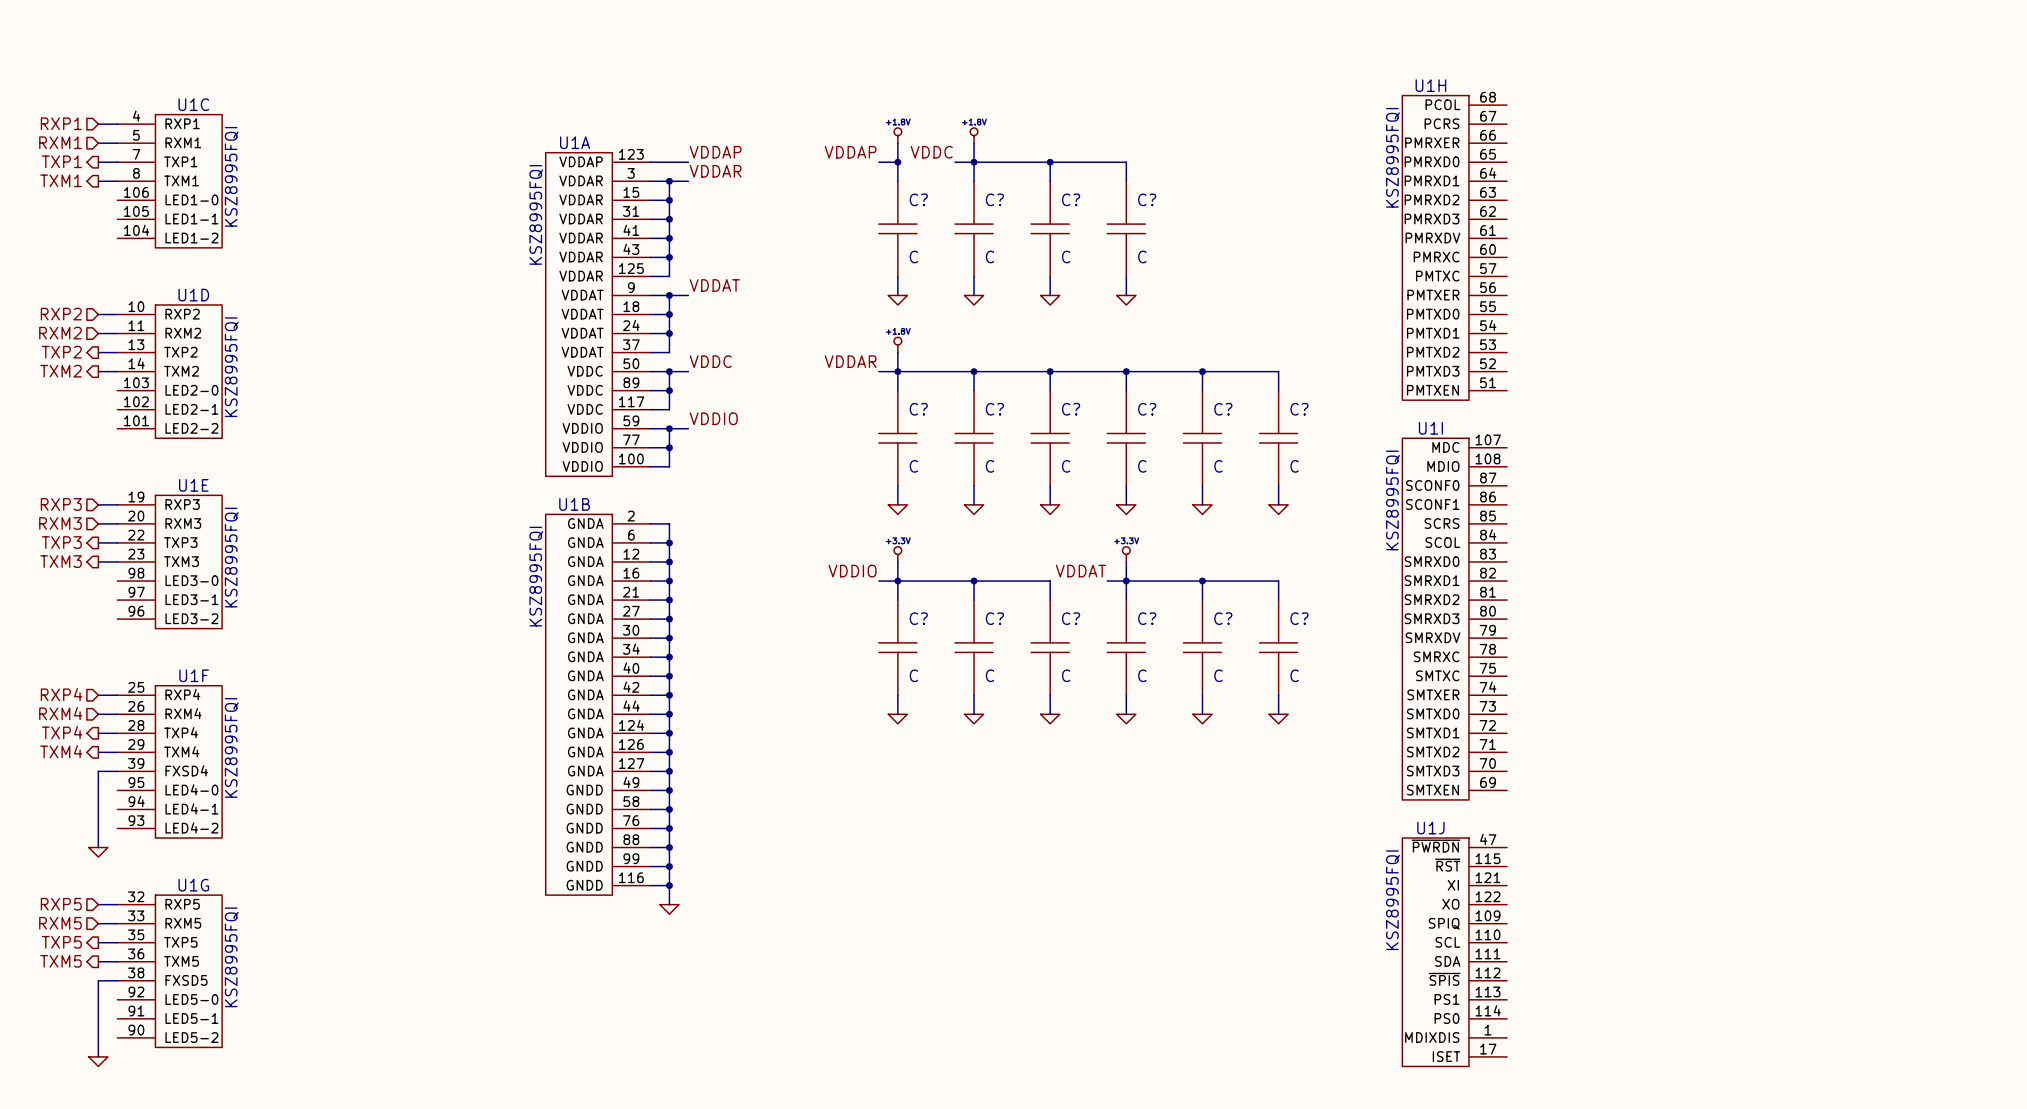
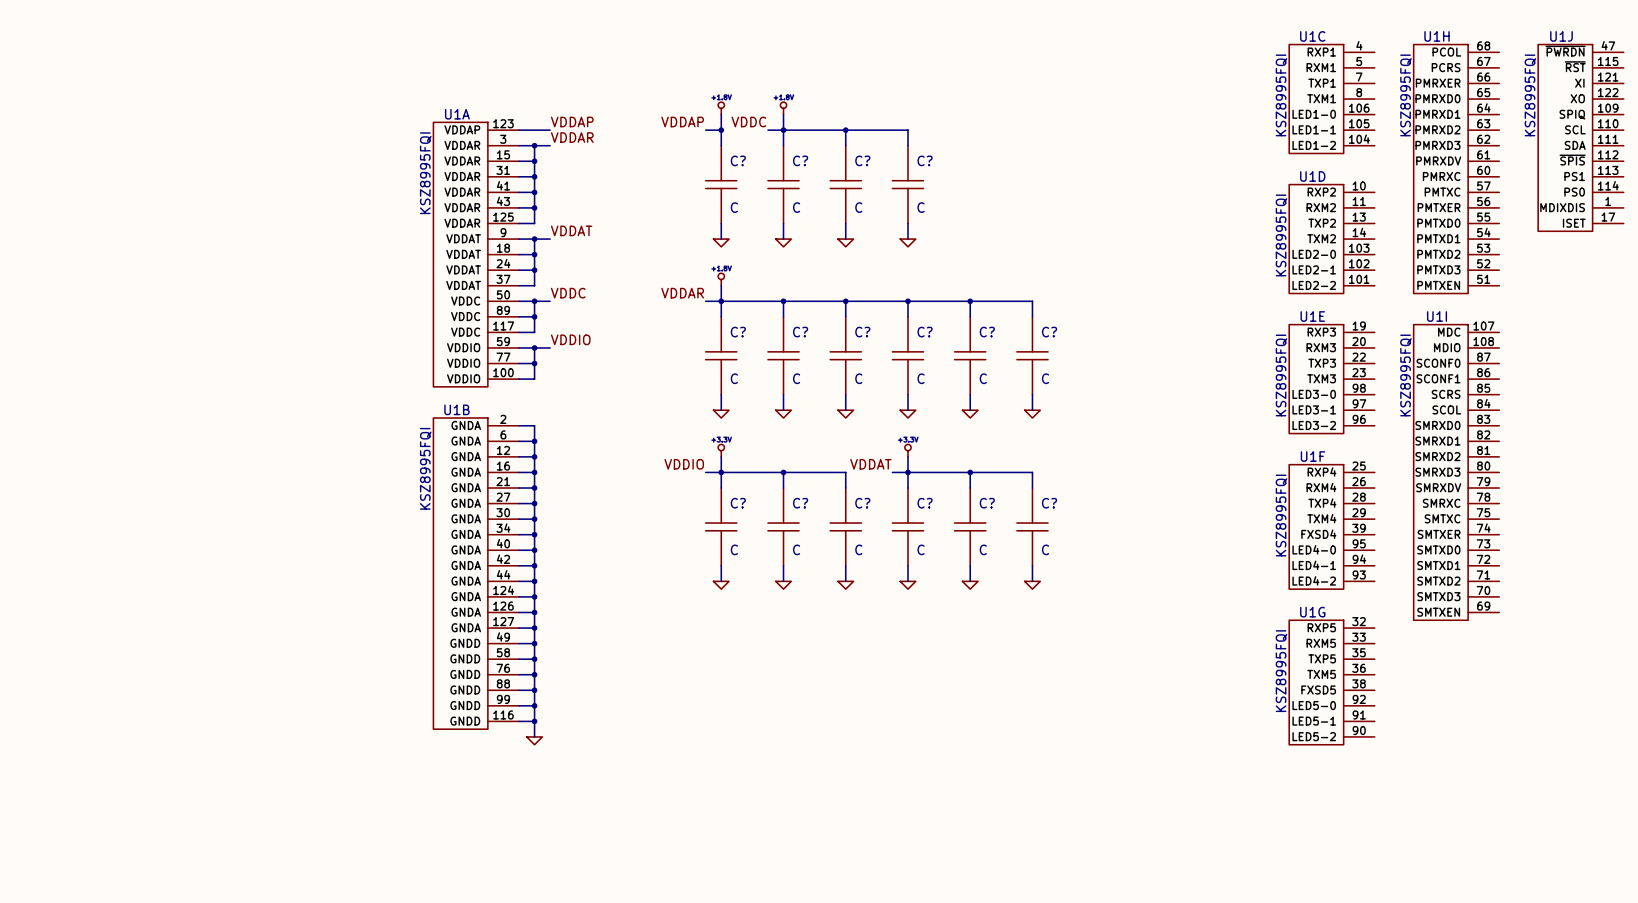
hierarchical label: RXP1 (61, 123) -> none
wire: (98, 124) (117, 124) -> none
hierarchical label: RXM1 (60, 142) -> none
wire: (98, 143) (117, 143) -> none
hierarchical label: TXP1 (61, 161) -> none
wire: (98, 162) (117, 162) -> none
hierarchical label: TXM1 (61, 180) -> none
wire: (98, 181) (117, 181) -> none
U1C position: (169, 181) -> (1331, 99)
U1C flip: as is (188, 181) -> left-right (1316, 99)
U1H position: (1454, 247) -> (1456, 169)
hierarchical label: RXP2 (61, 314) -> none
wire: (98, 314) (117, 314) -> none
hierarchical label: RXM2 (60, 333) -> none
wire: (98, 333) (117, 333) -> none
hierarchical label: TXP2 (61, 352) -> none
wire: (98, 352) (117, 352) -> none
hierarchical label: TXM2 (61, 371) -> none
wire: (98, 371) (117, 371) -> none
U1D position: (169, 371) -> (1331, 239)
U1D flip: as is (188, 371) -> left-right (1316, 239)
hierarchical label: RXP3 (61, 504) -> none
wire: (98, 504) (117, 504) -> none
hierarchical label: RXM3 (60, 523) -> none
wire: (98, 523) (117, 523) -> none
hierarchical label: TXP3 (61, 542) -> none
wire: (98, 542) (117, 542) -> none
hierarchical label: TXM3 (61, 561) -> none
wire: (98, 561) (117, 561) -> none
U1E position: (169, 561) -> (1331, 379)
U1E flip: as is (188, 561) -> left-right (1316, 379)
U1I position: (1454, 619) -> (1456, 472)
hierarchical label: RXP4 (61, 694) -> none
wire: (98, 695) (117, 695) -> none
hierarchical label: RXM4 (60, 713) -> none
wire: (98, 714) (117, 714) -> none
hierarchical label: TXP4 (62, 732) -> none
wire: (98, 733) (117, 733) -> none
hierarchical label: TXM4 (61, 751) -> none
wire: (98, 752) (117, 752) -> none
U1F position: (169, 761) -> (1331, 526)
U1F flip: as is (188, 761) -> left-right (1316, 526)
wire: (117, 771) (98, 771) (98, 847) -> none
power symbol: (98, 852) -> none
hierarchical label: RXP5 (61, 904) -> none
wire: (98, 904) (117, 904) -> none
hierarchical label: RXM5 (60, 923) -> none
wire: (98, 923) (117, 923) -> none
hierarchical label: TXP5 (61, 942) -> none
wire: (98, 942) (117, 942) -> none
U1J position: (1454, 952) -> (1580, 137)
hierarchical label: TXM5 (61, 961) -> none
wire: (98, 961) (117, 961) -> none
U1G position: (169, 971) -> (1331, 682)
U1G flip: as is (188, 971) -> left-right (1316, 682)
wire: (117, 980) (98, 980) (98, 1056) -> none
power symbol: (98, 1061) -> none

